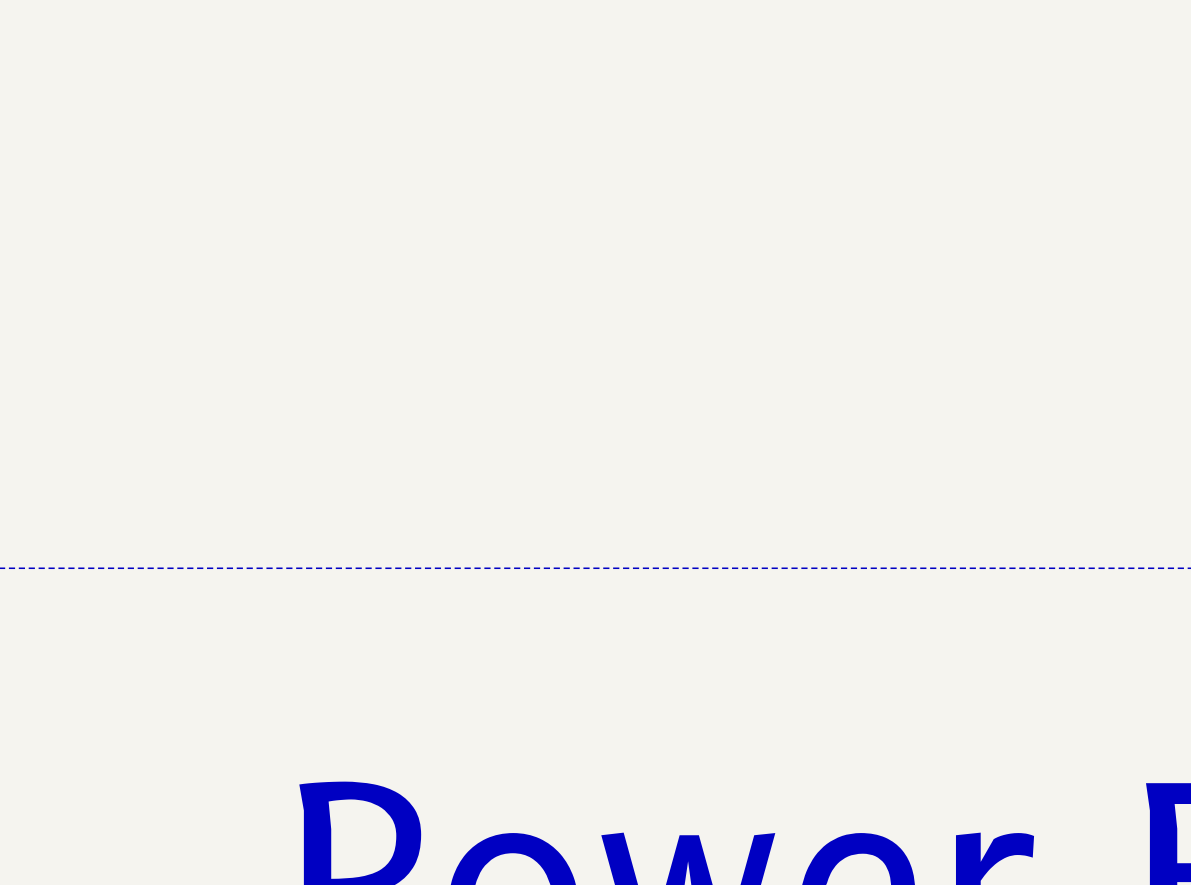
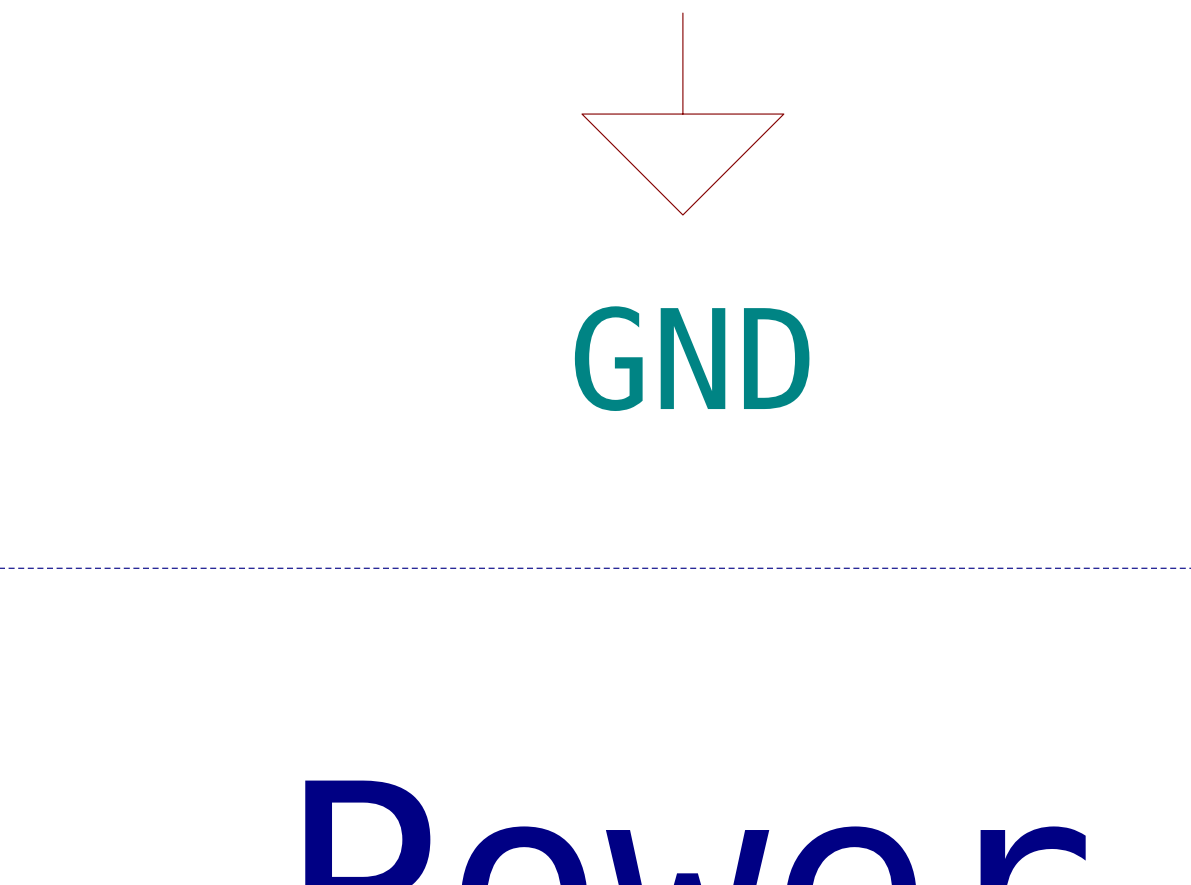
power symbol: none -> GND (682, 114)

